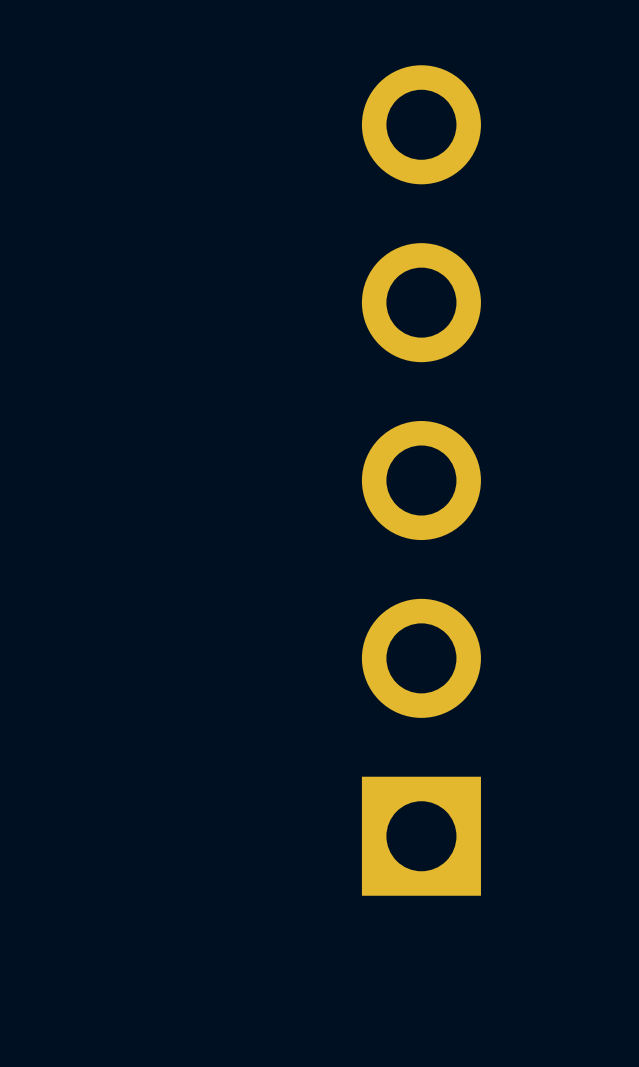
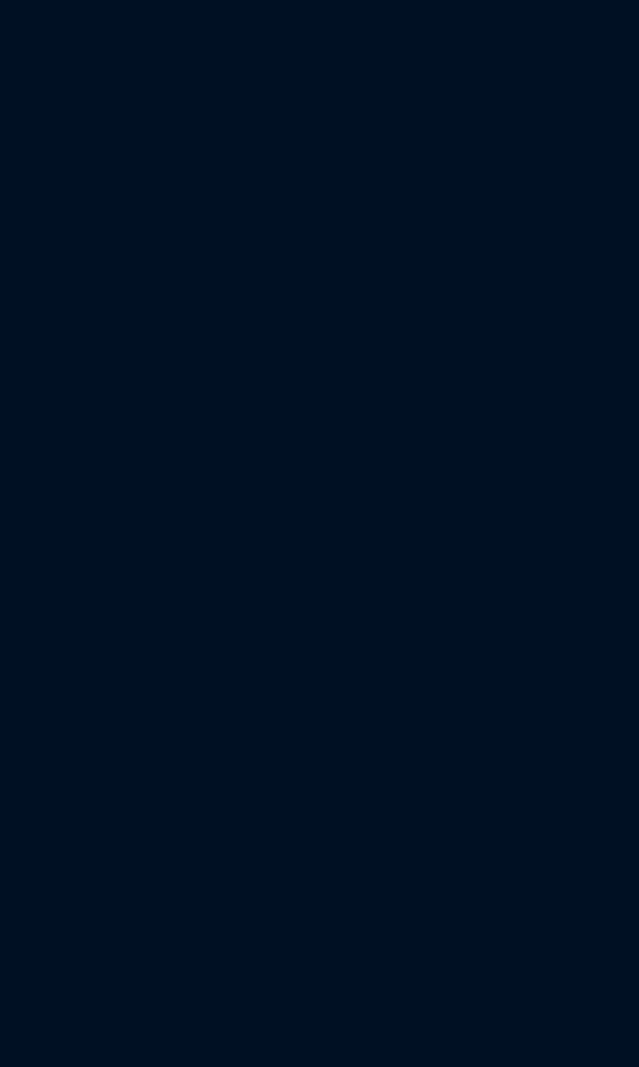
part: (421, 480) -> none

